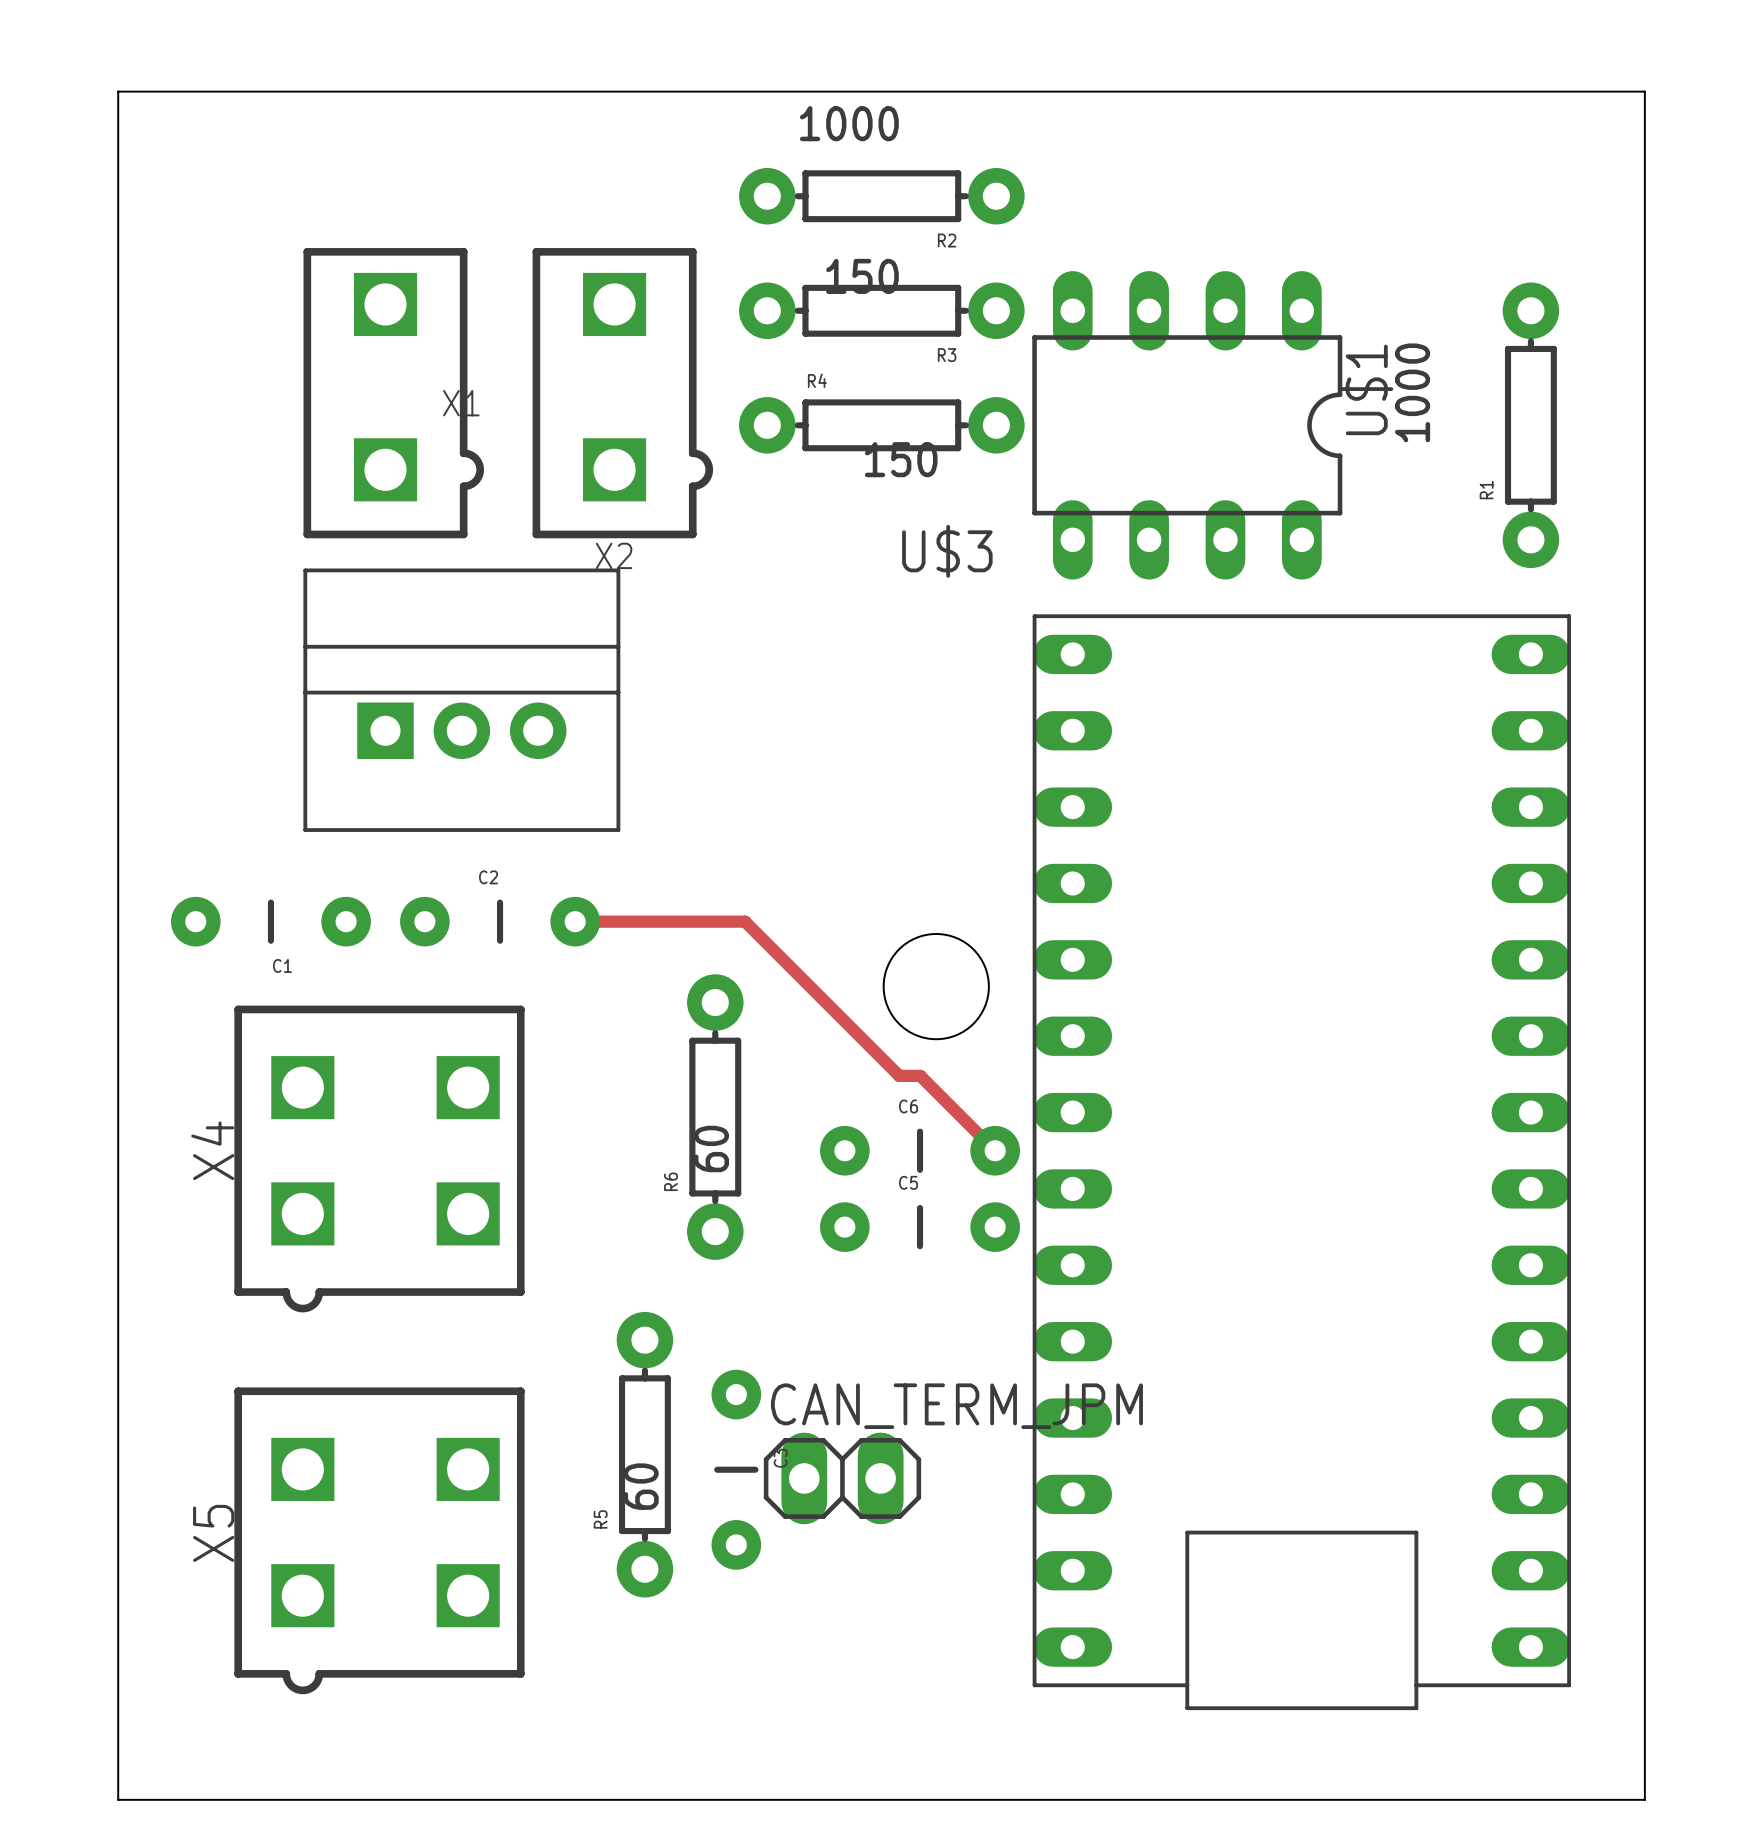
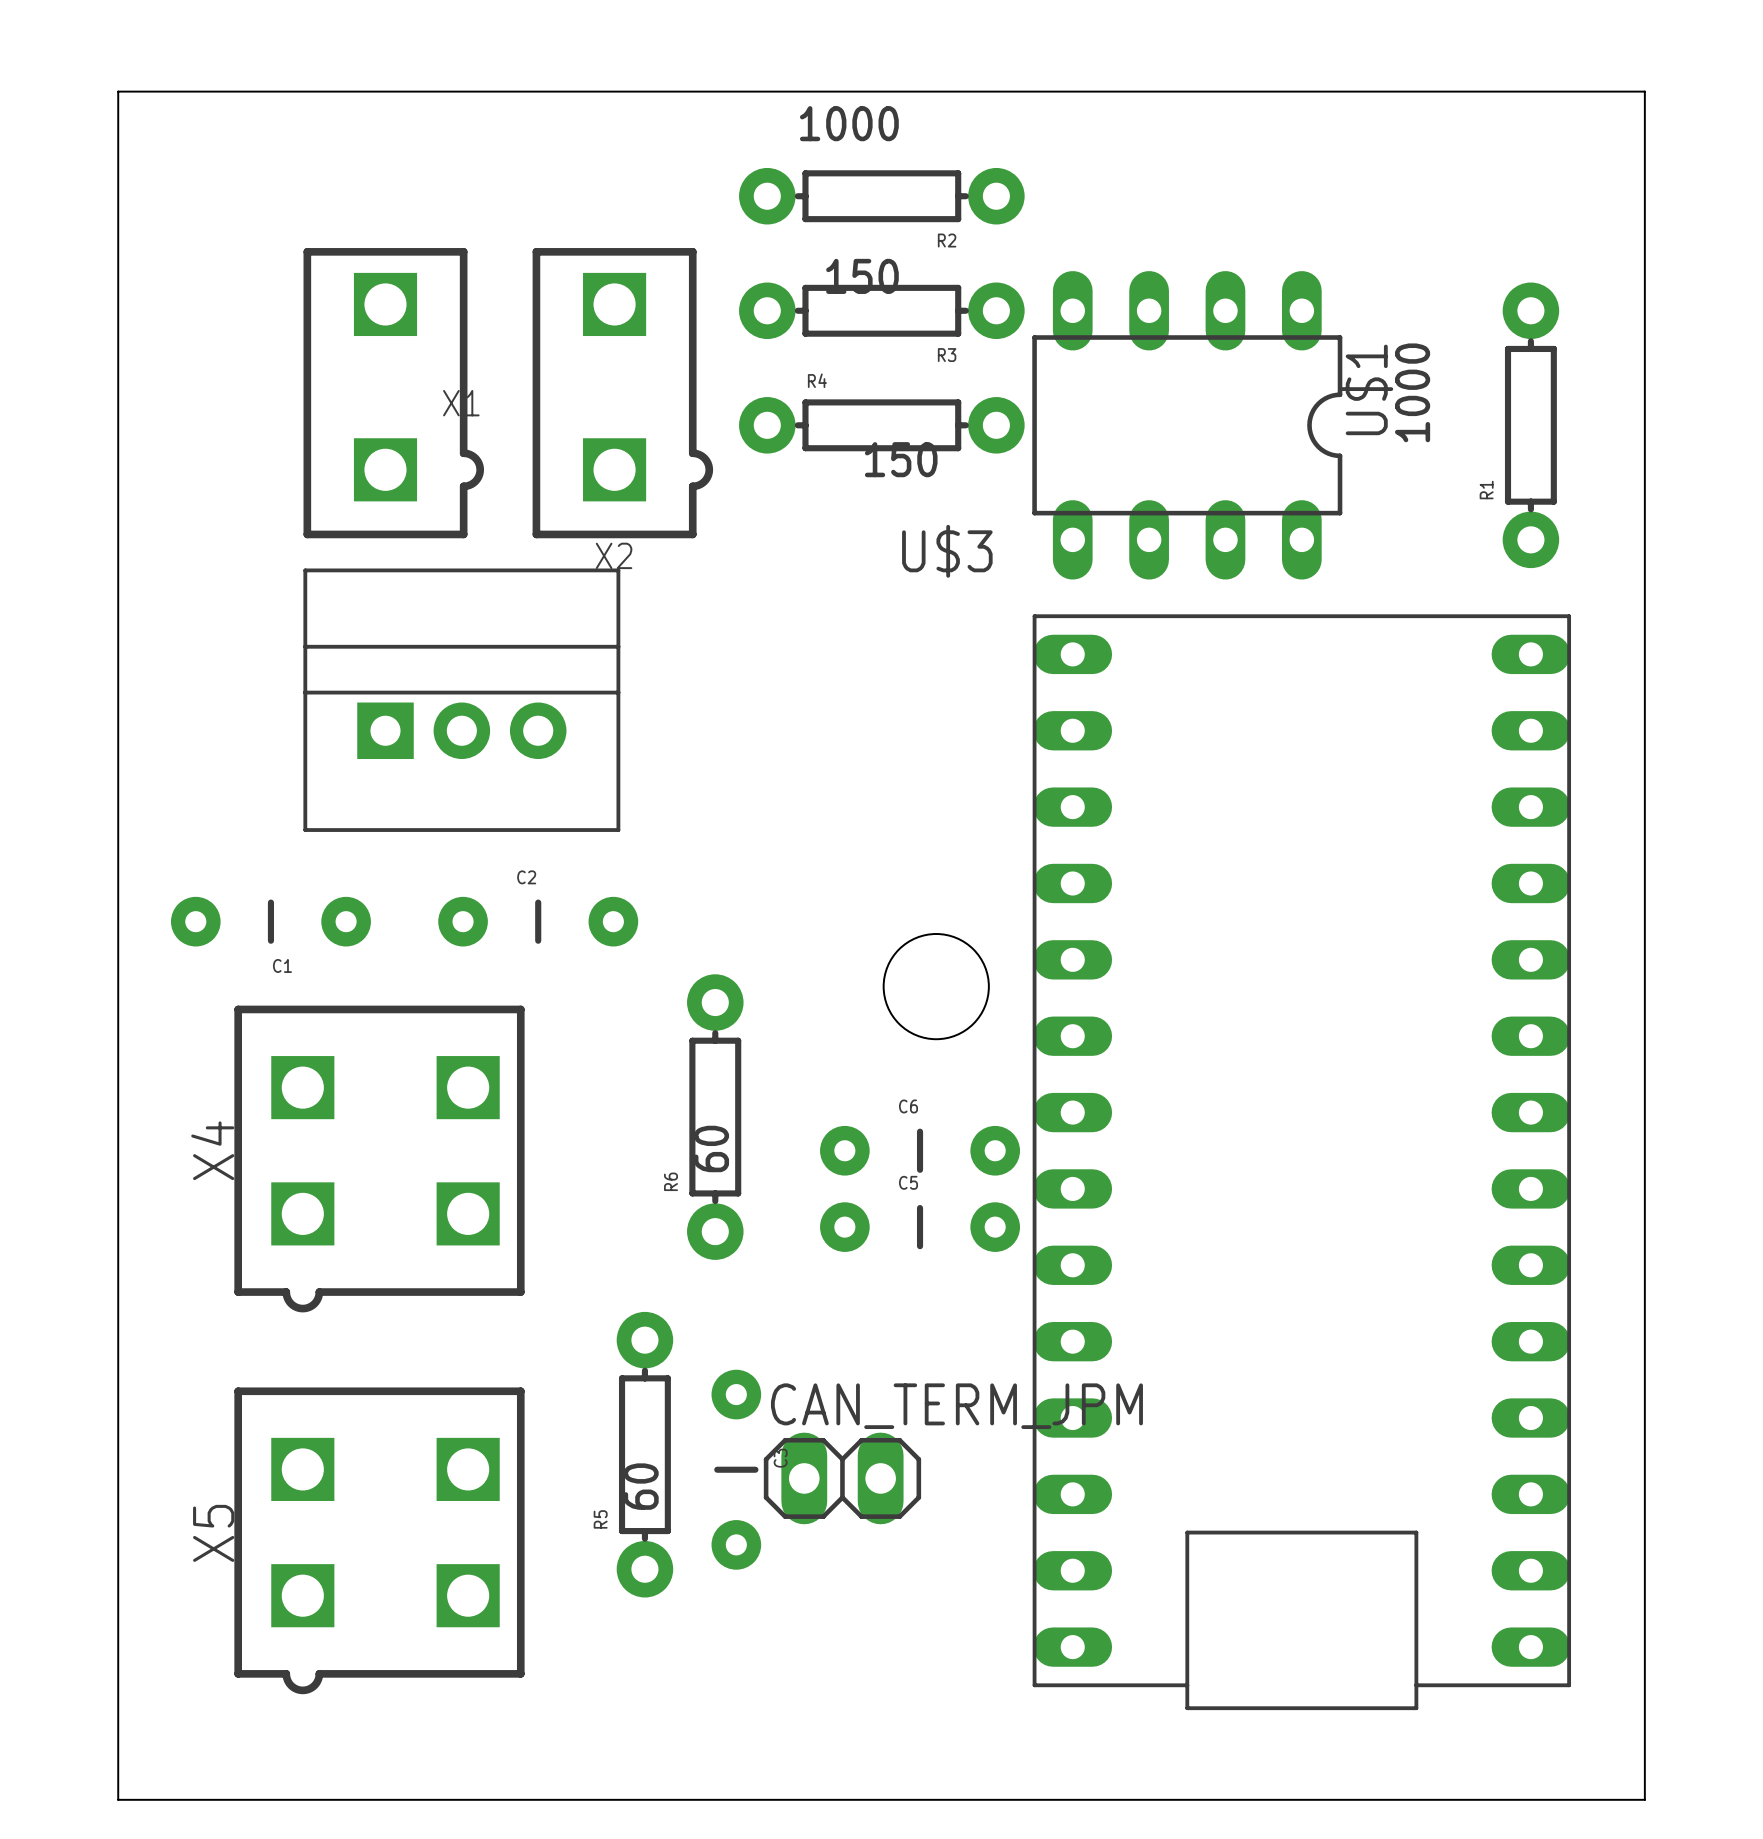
C2 position: (500, 921) -> (538, 921)
track: (575, 921) (745, 921) (899, 1075) (920, 1075) (995, 1150) -> none

